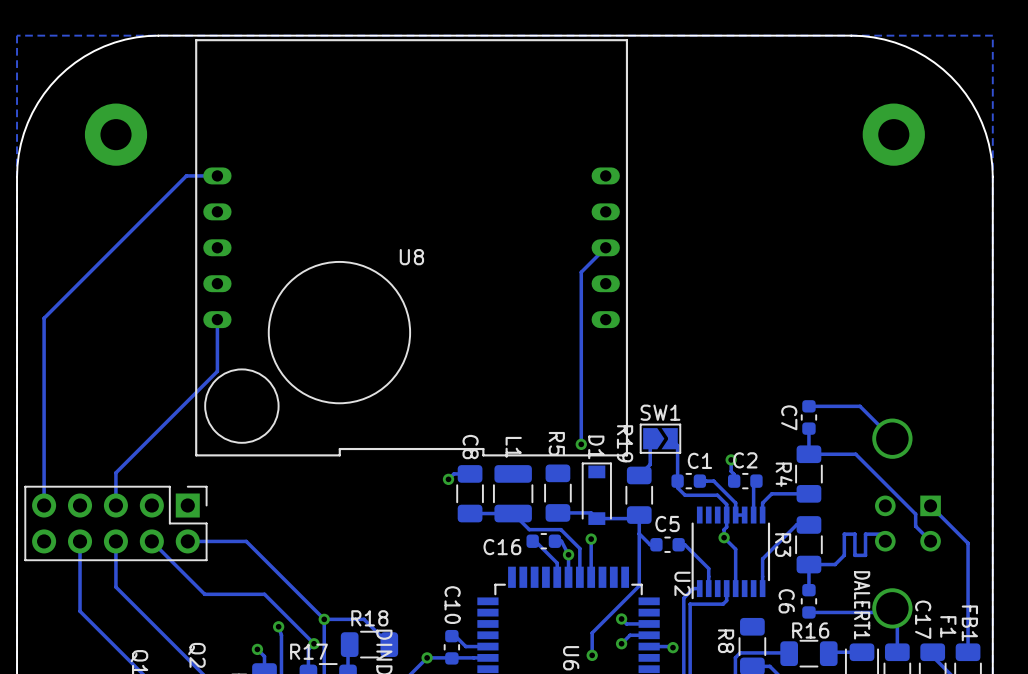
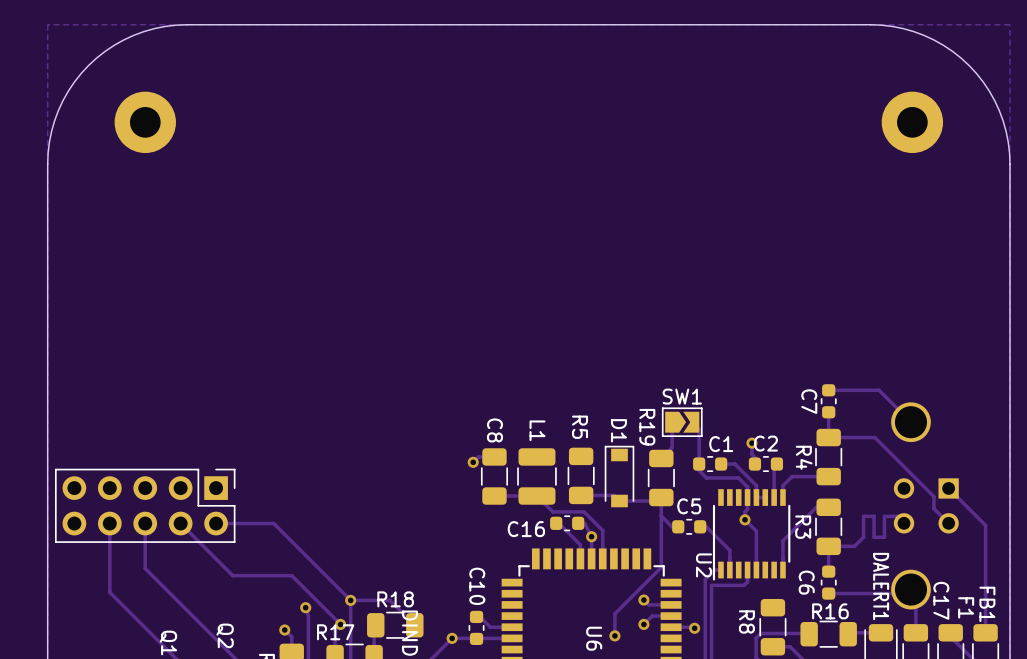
track: (217, 175) (186, 175) (44, 318) (44, 505) -> none
U8: (411, 247) -> none
track: (605, 247) (581, 272) (581, 444) -> none
track: (217, 319) (217, 371) (115, 472) (115, 505) -> none
via: (581, 444) -> none
track: (591, 539) (591, 577) -> none
via: (591, 539) -> none

